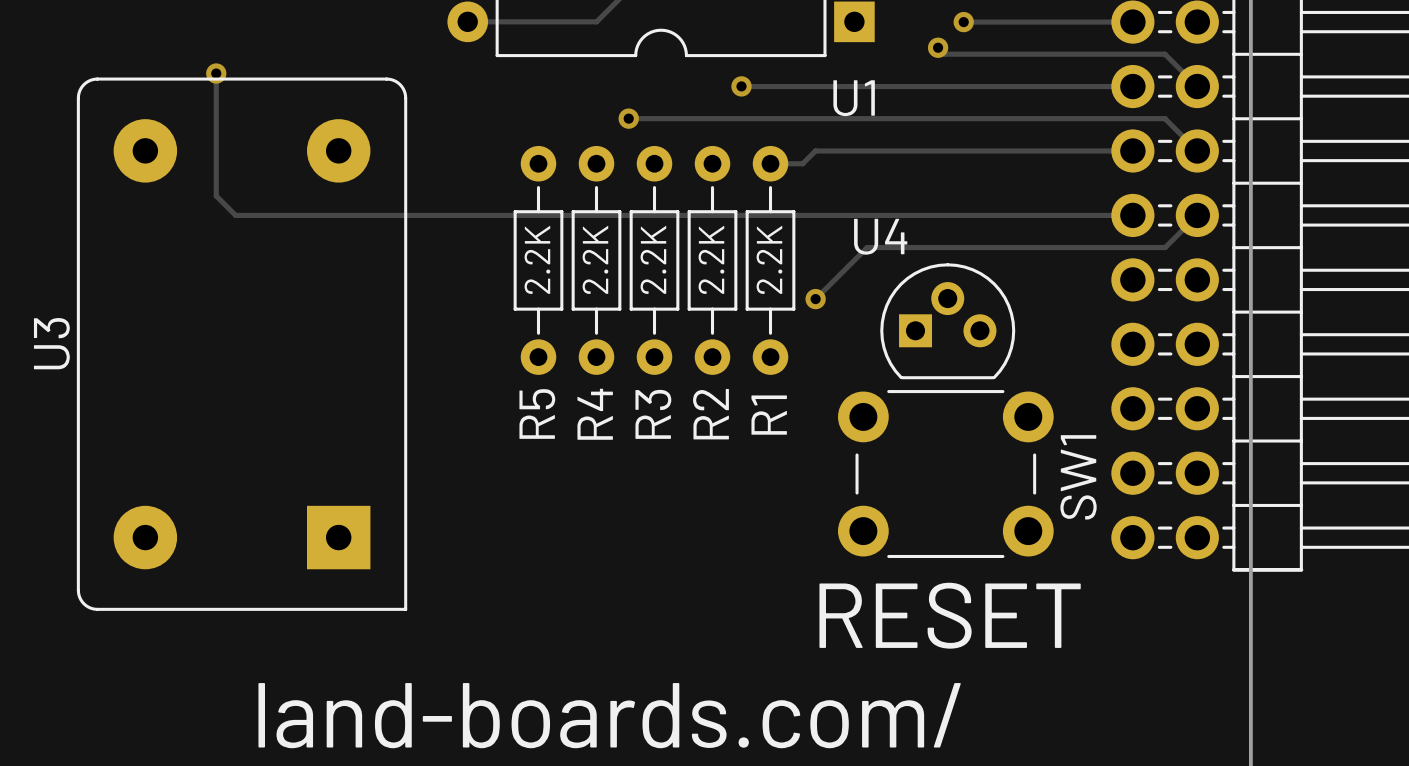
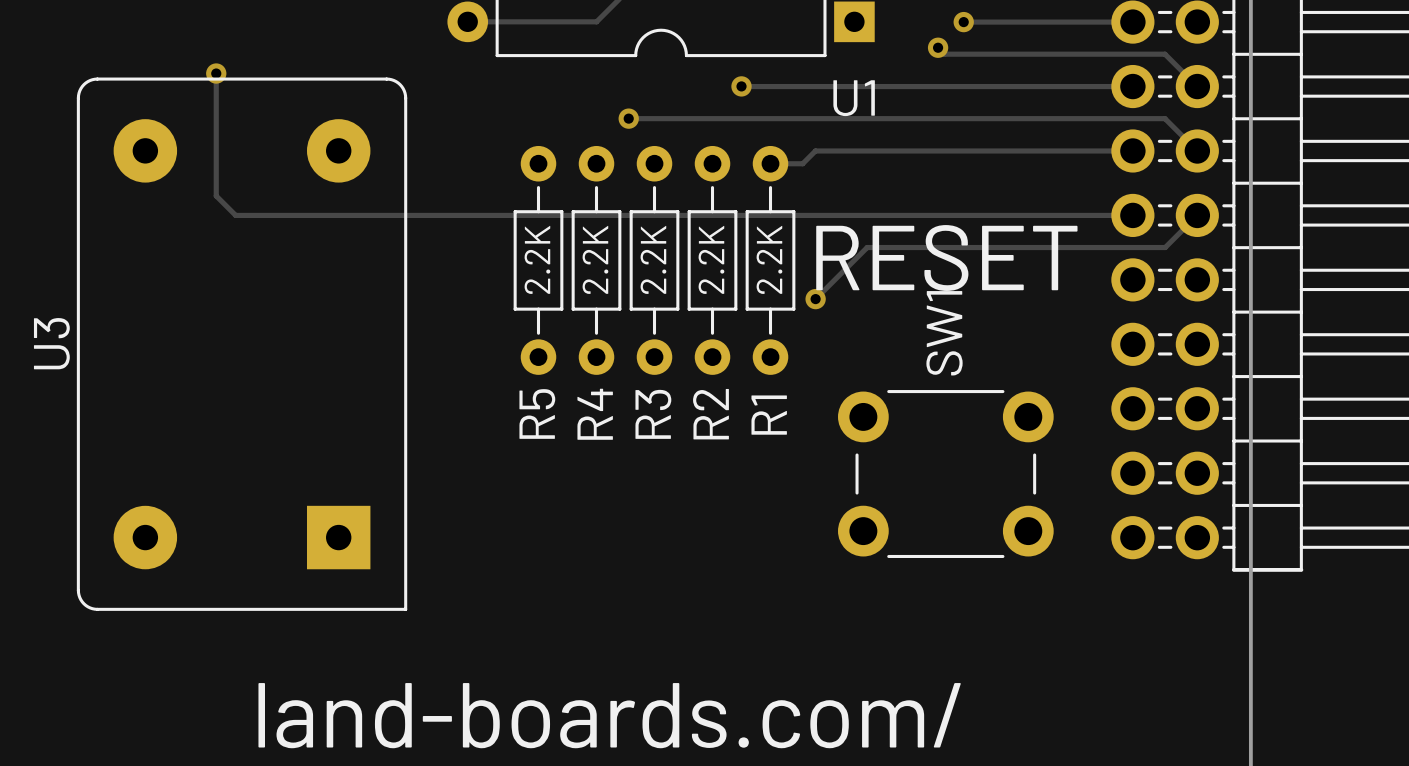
U4: (947, 321) -> none
SW1 name position: SW1 (1078, 477) -> SW1 (944, 333)
text position: RESET (950, 615) -> RESET (946, 258)

